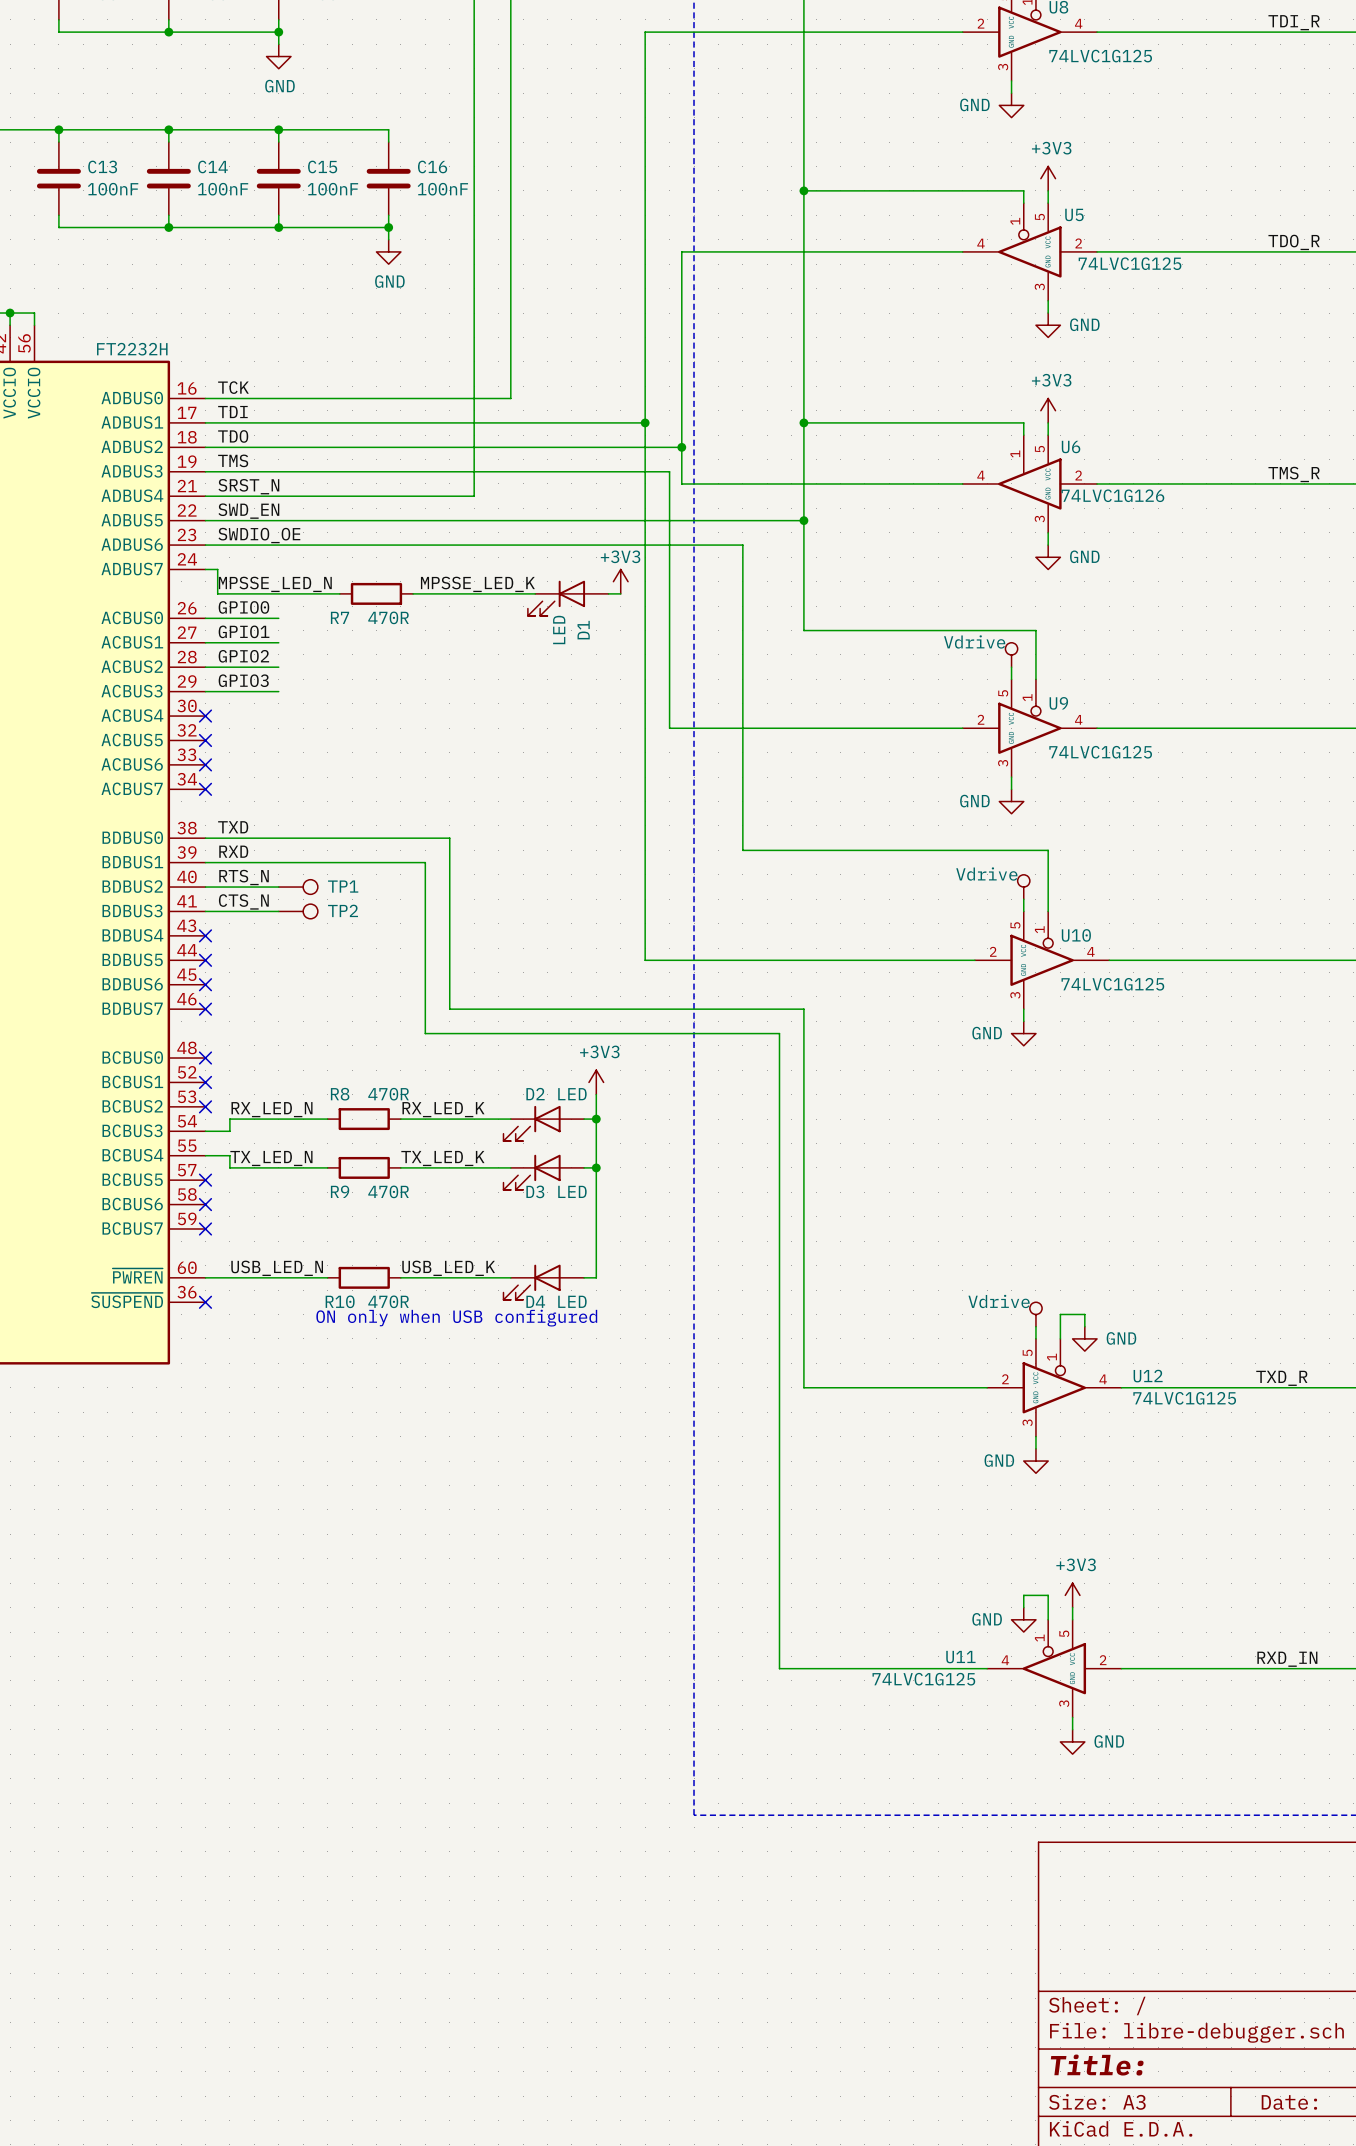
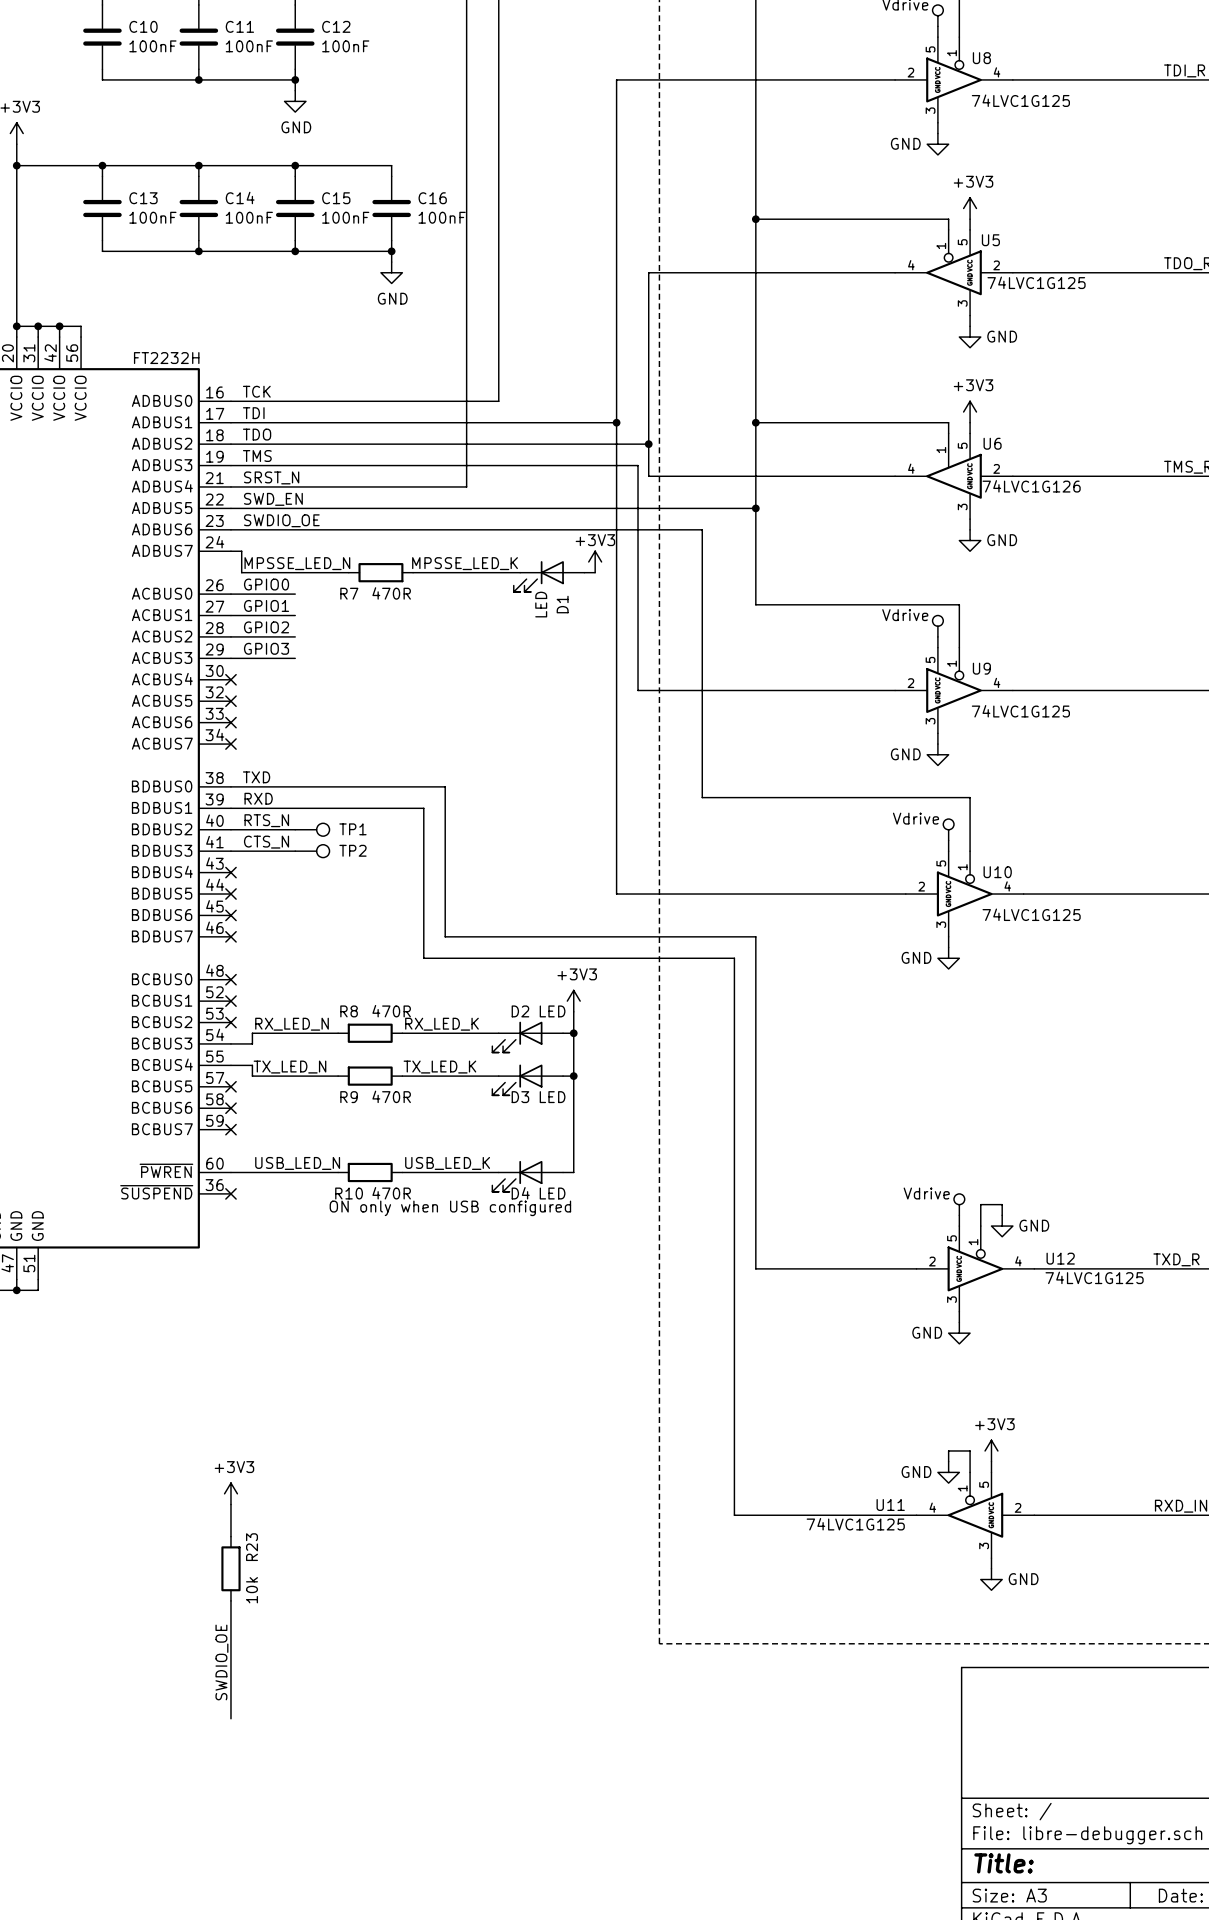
power symbol: none -> +3V3 (230, 1493)
wire: none -> (230, 1504) (230, 1536)
R23: none -> 10k (230, 1568)
wire: none -> (230, 1600) (230, 1718)
label: none -> SWDIO_OE (221, 1662)

